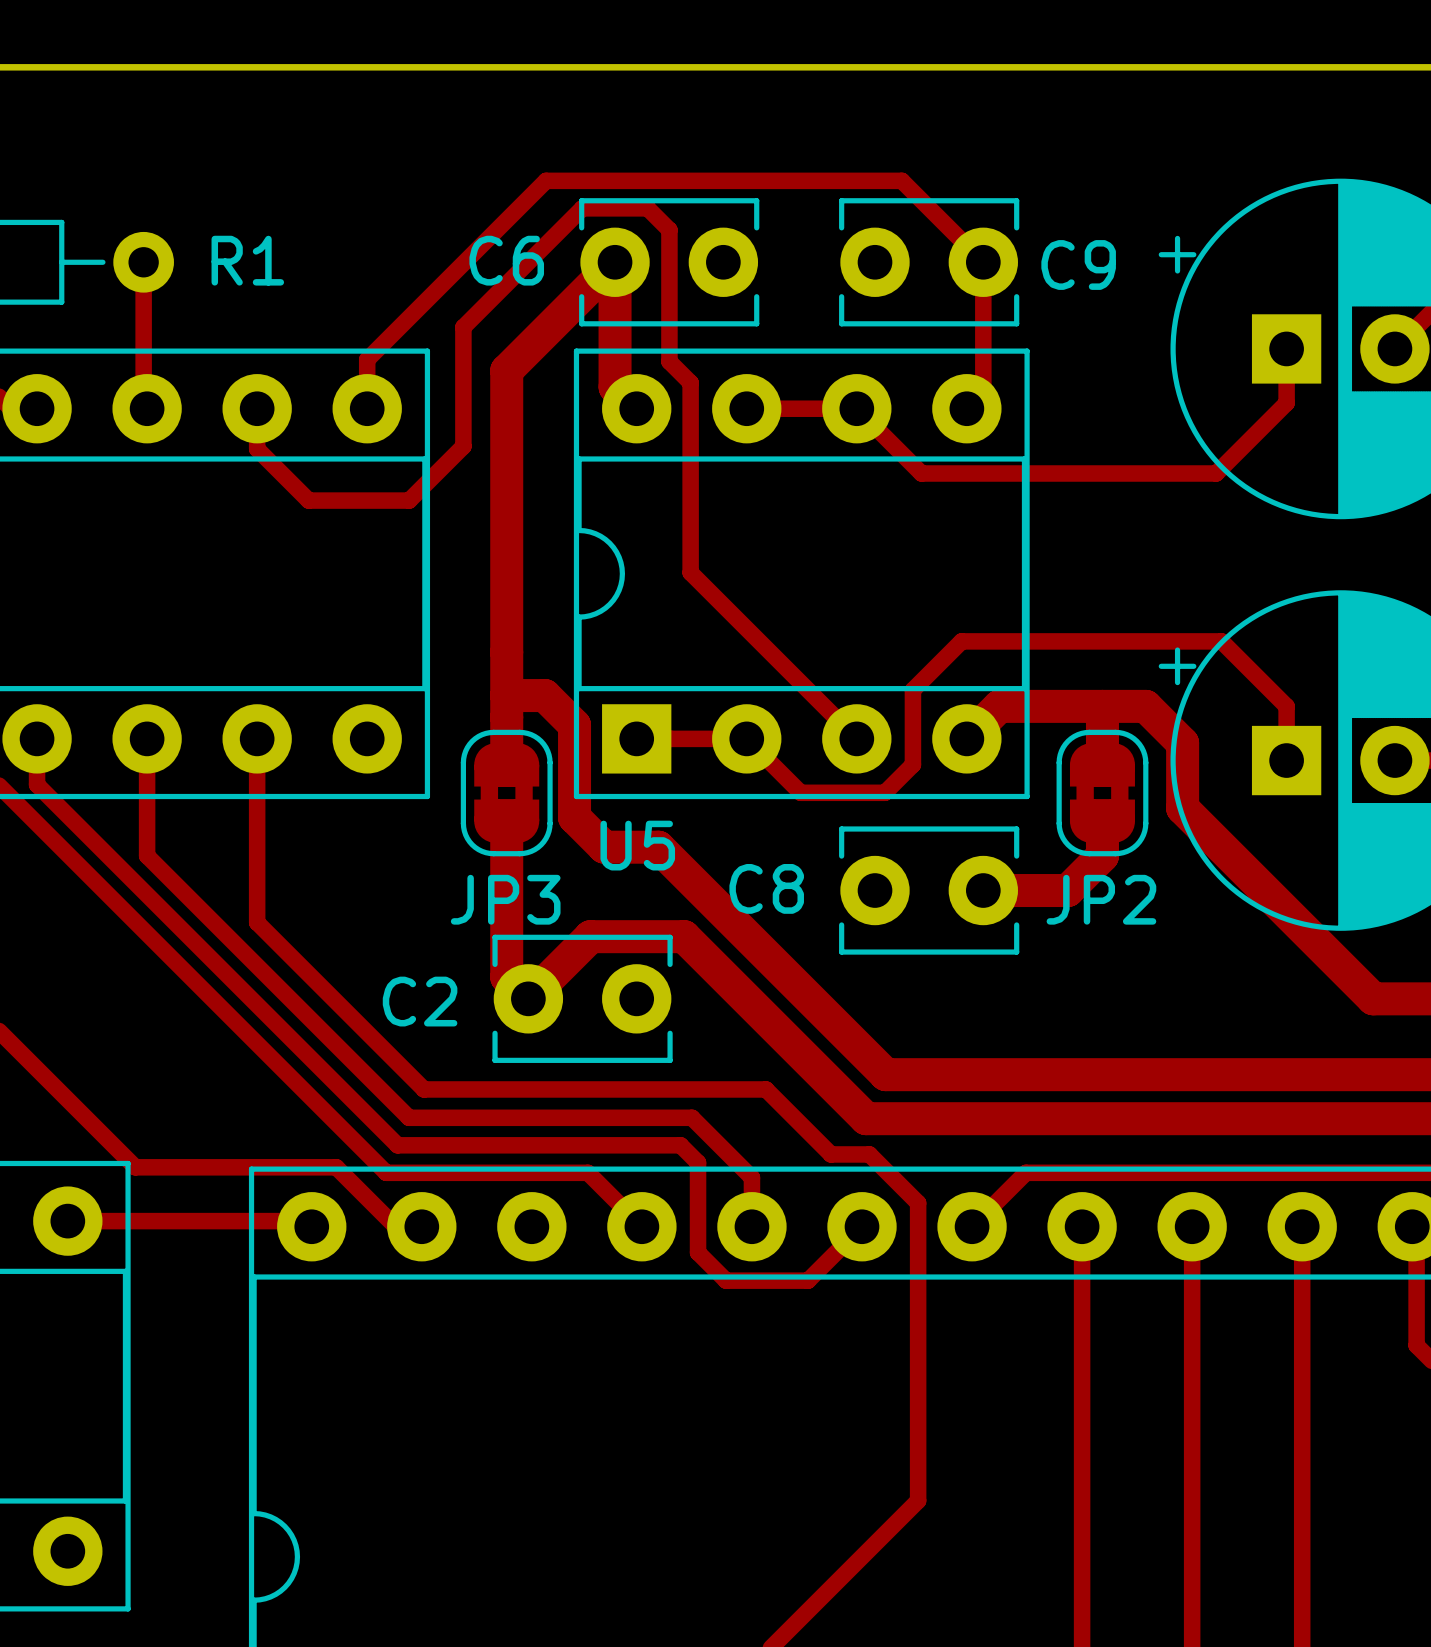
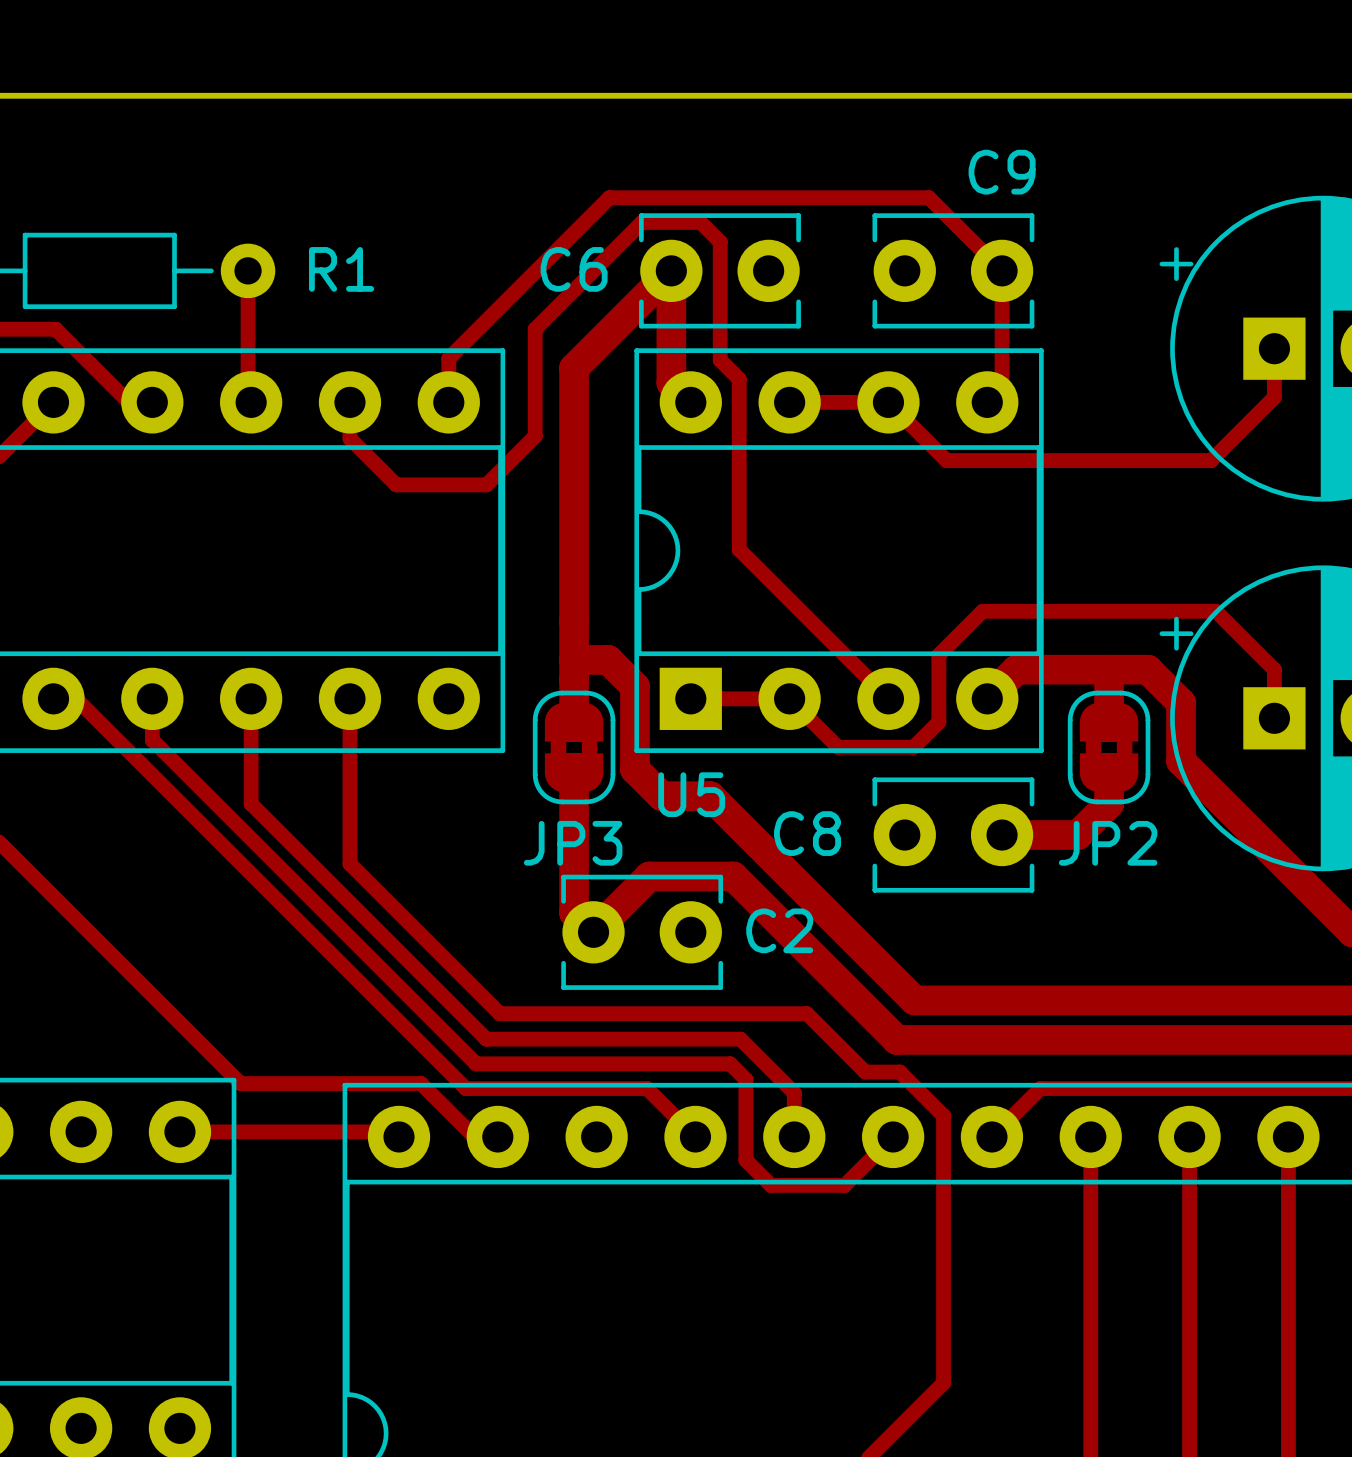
C9 name position: C9 (1078, 264) -> C9 (1002, 172)
C2 name position: C2 (420, 1001) -> C2 (779, 930)

